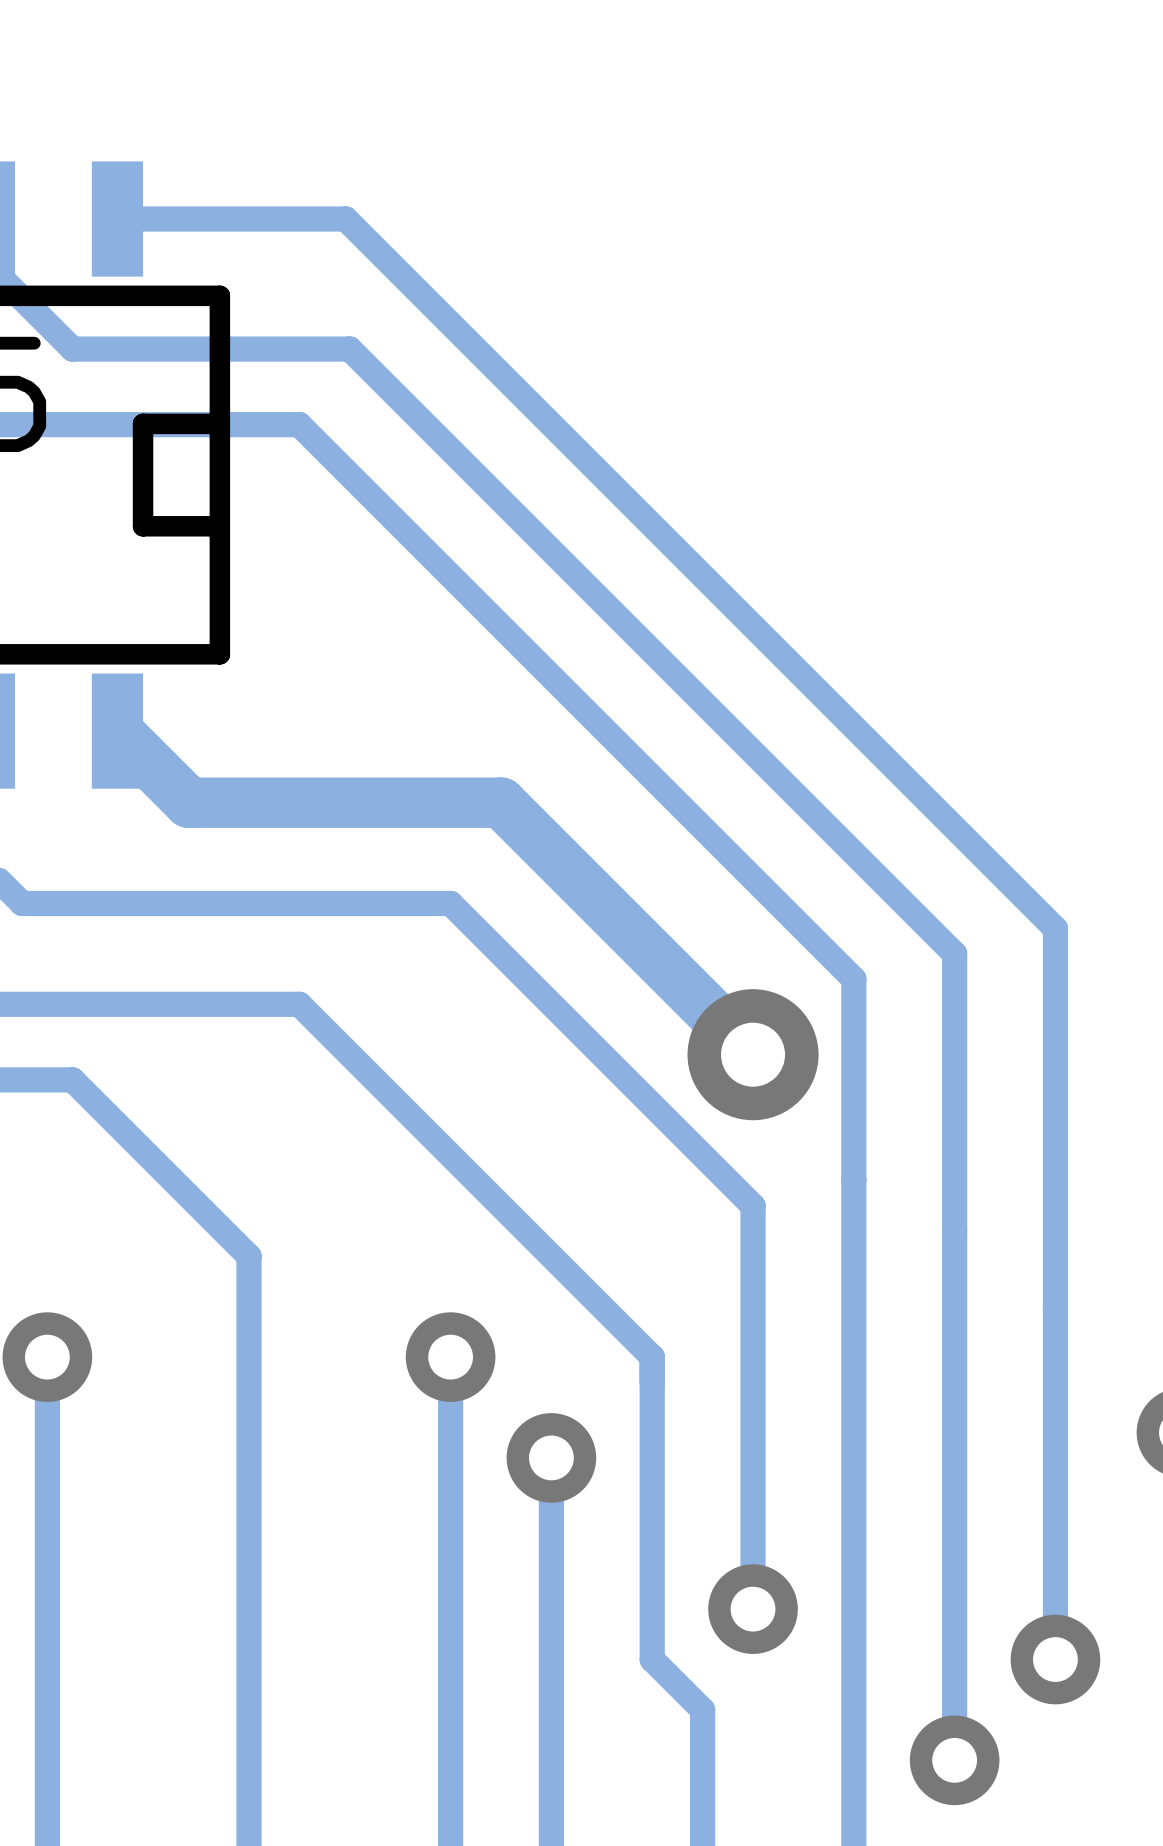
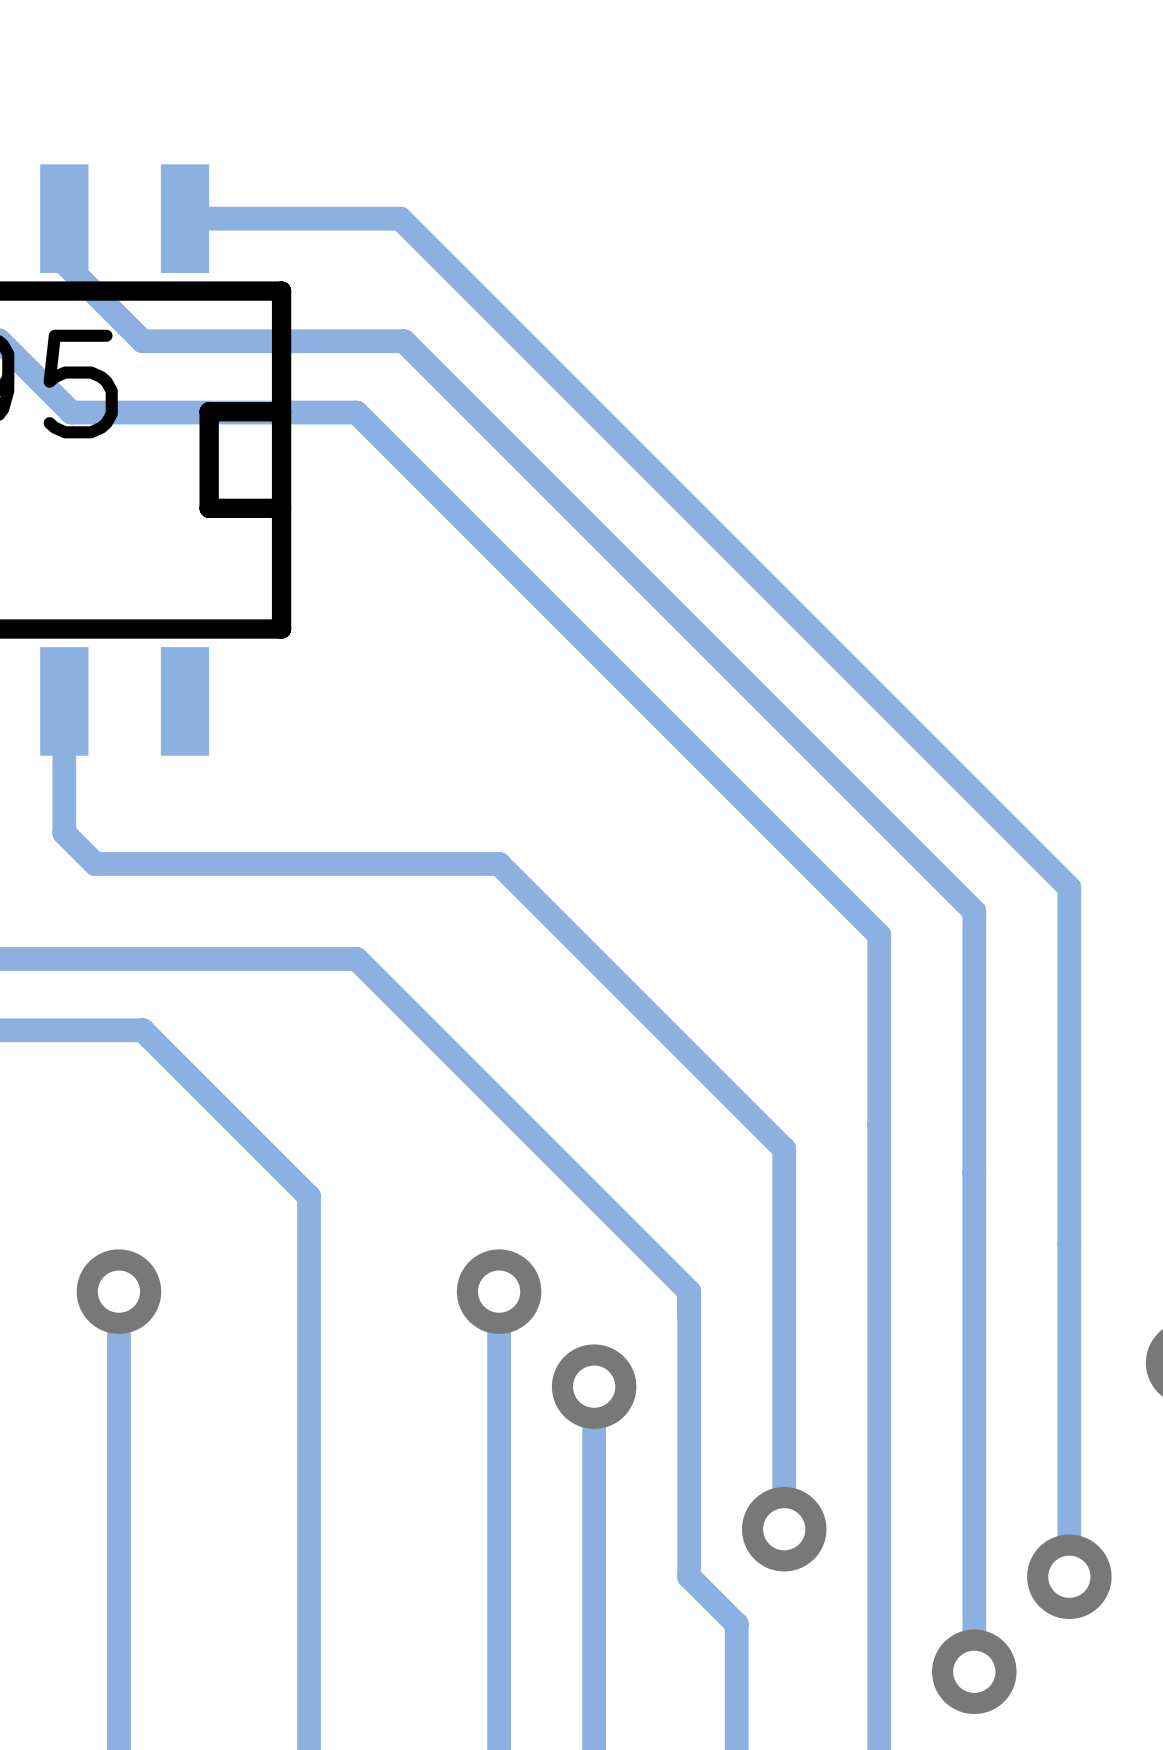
track: (117, 731) (189, 802) (501, 802) (753, 1054) -> none
via: (753, 1054) -> none

